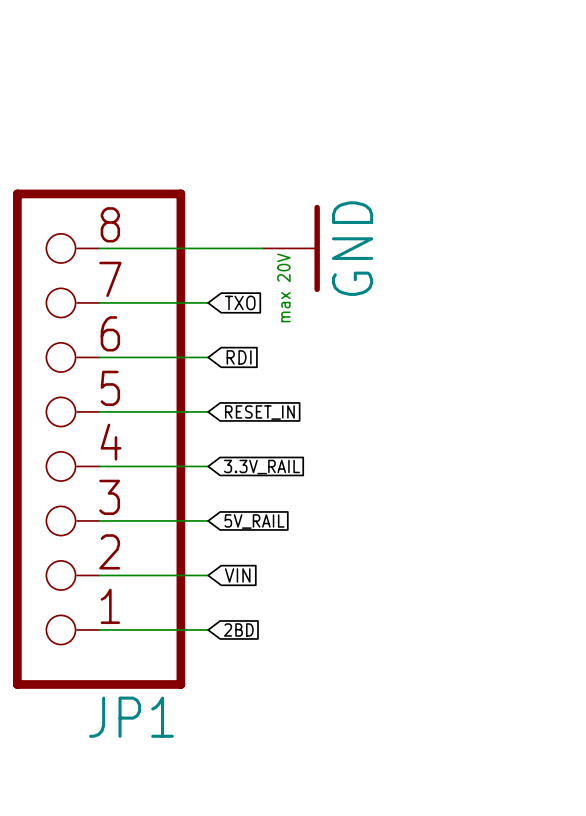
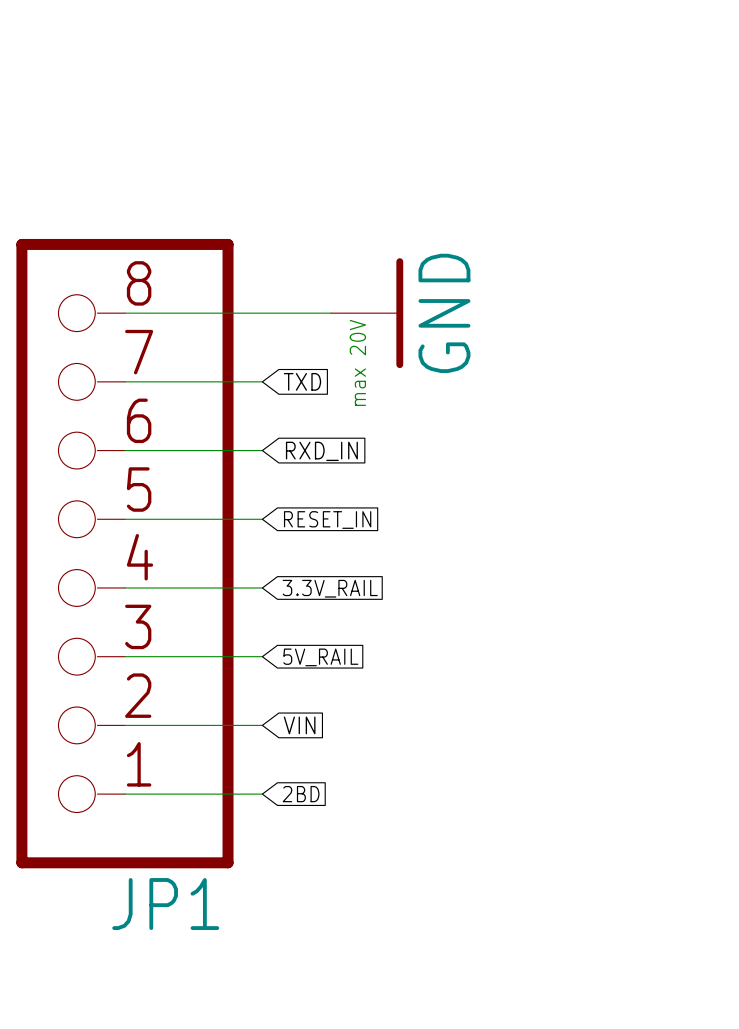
global label: TXO (240, 302) -> TXD (302, 381)
global label: RDI (239, 357) -> RXD_IN (321, 451)

